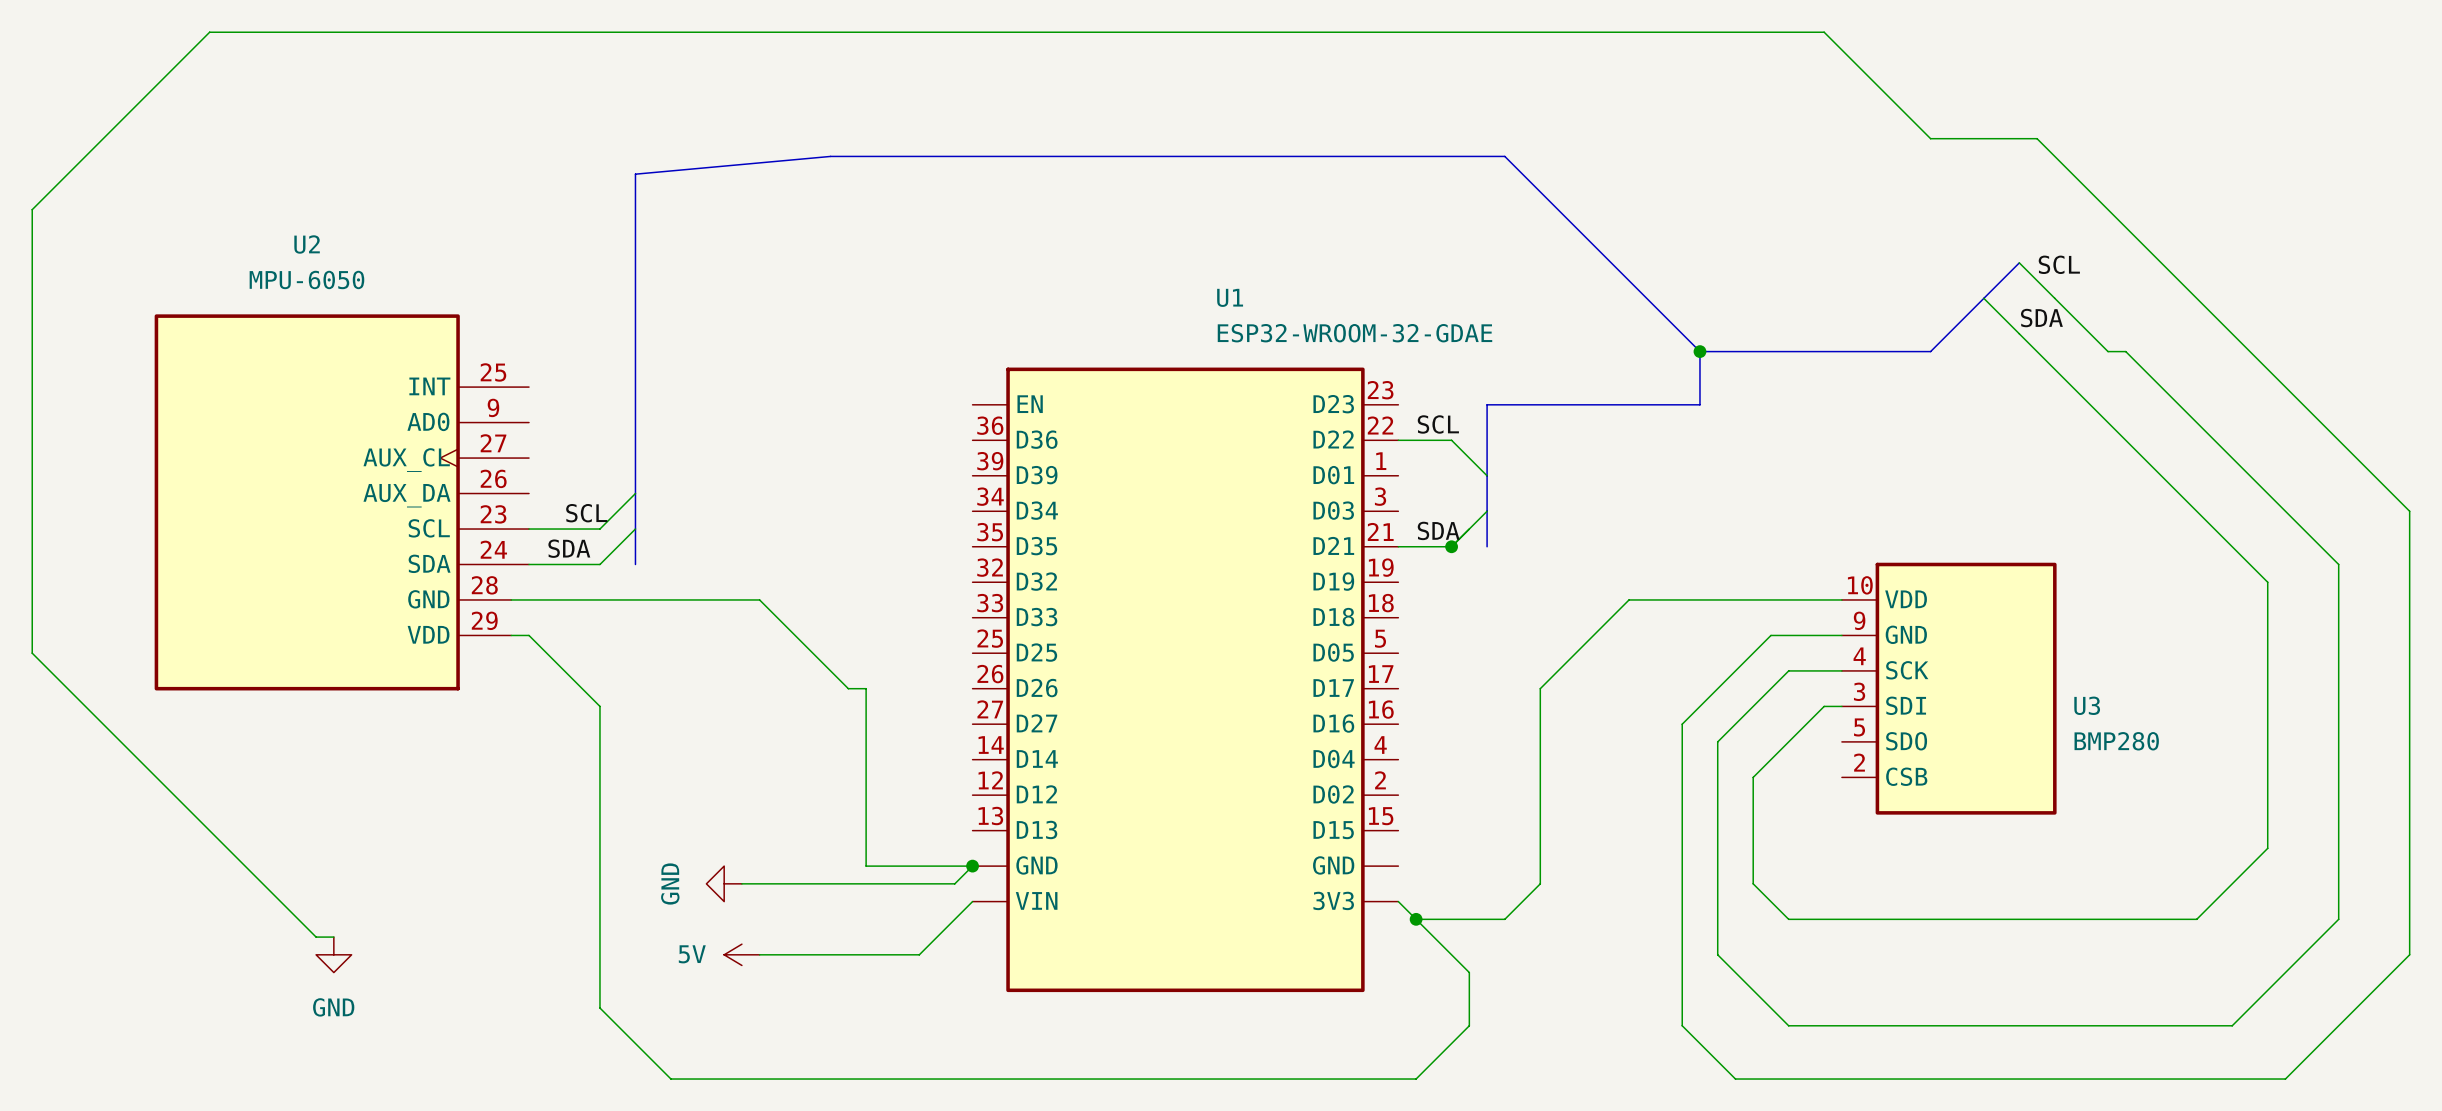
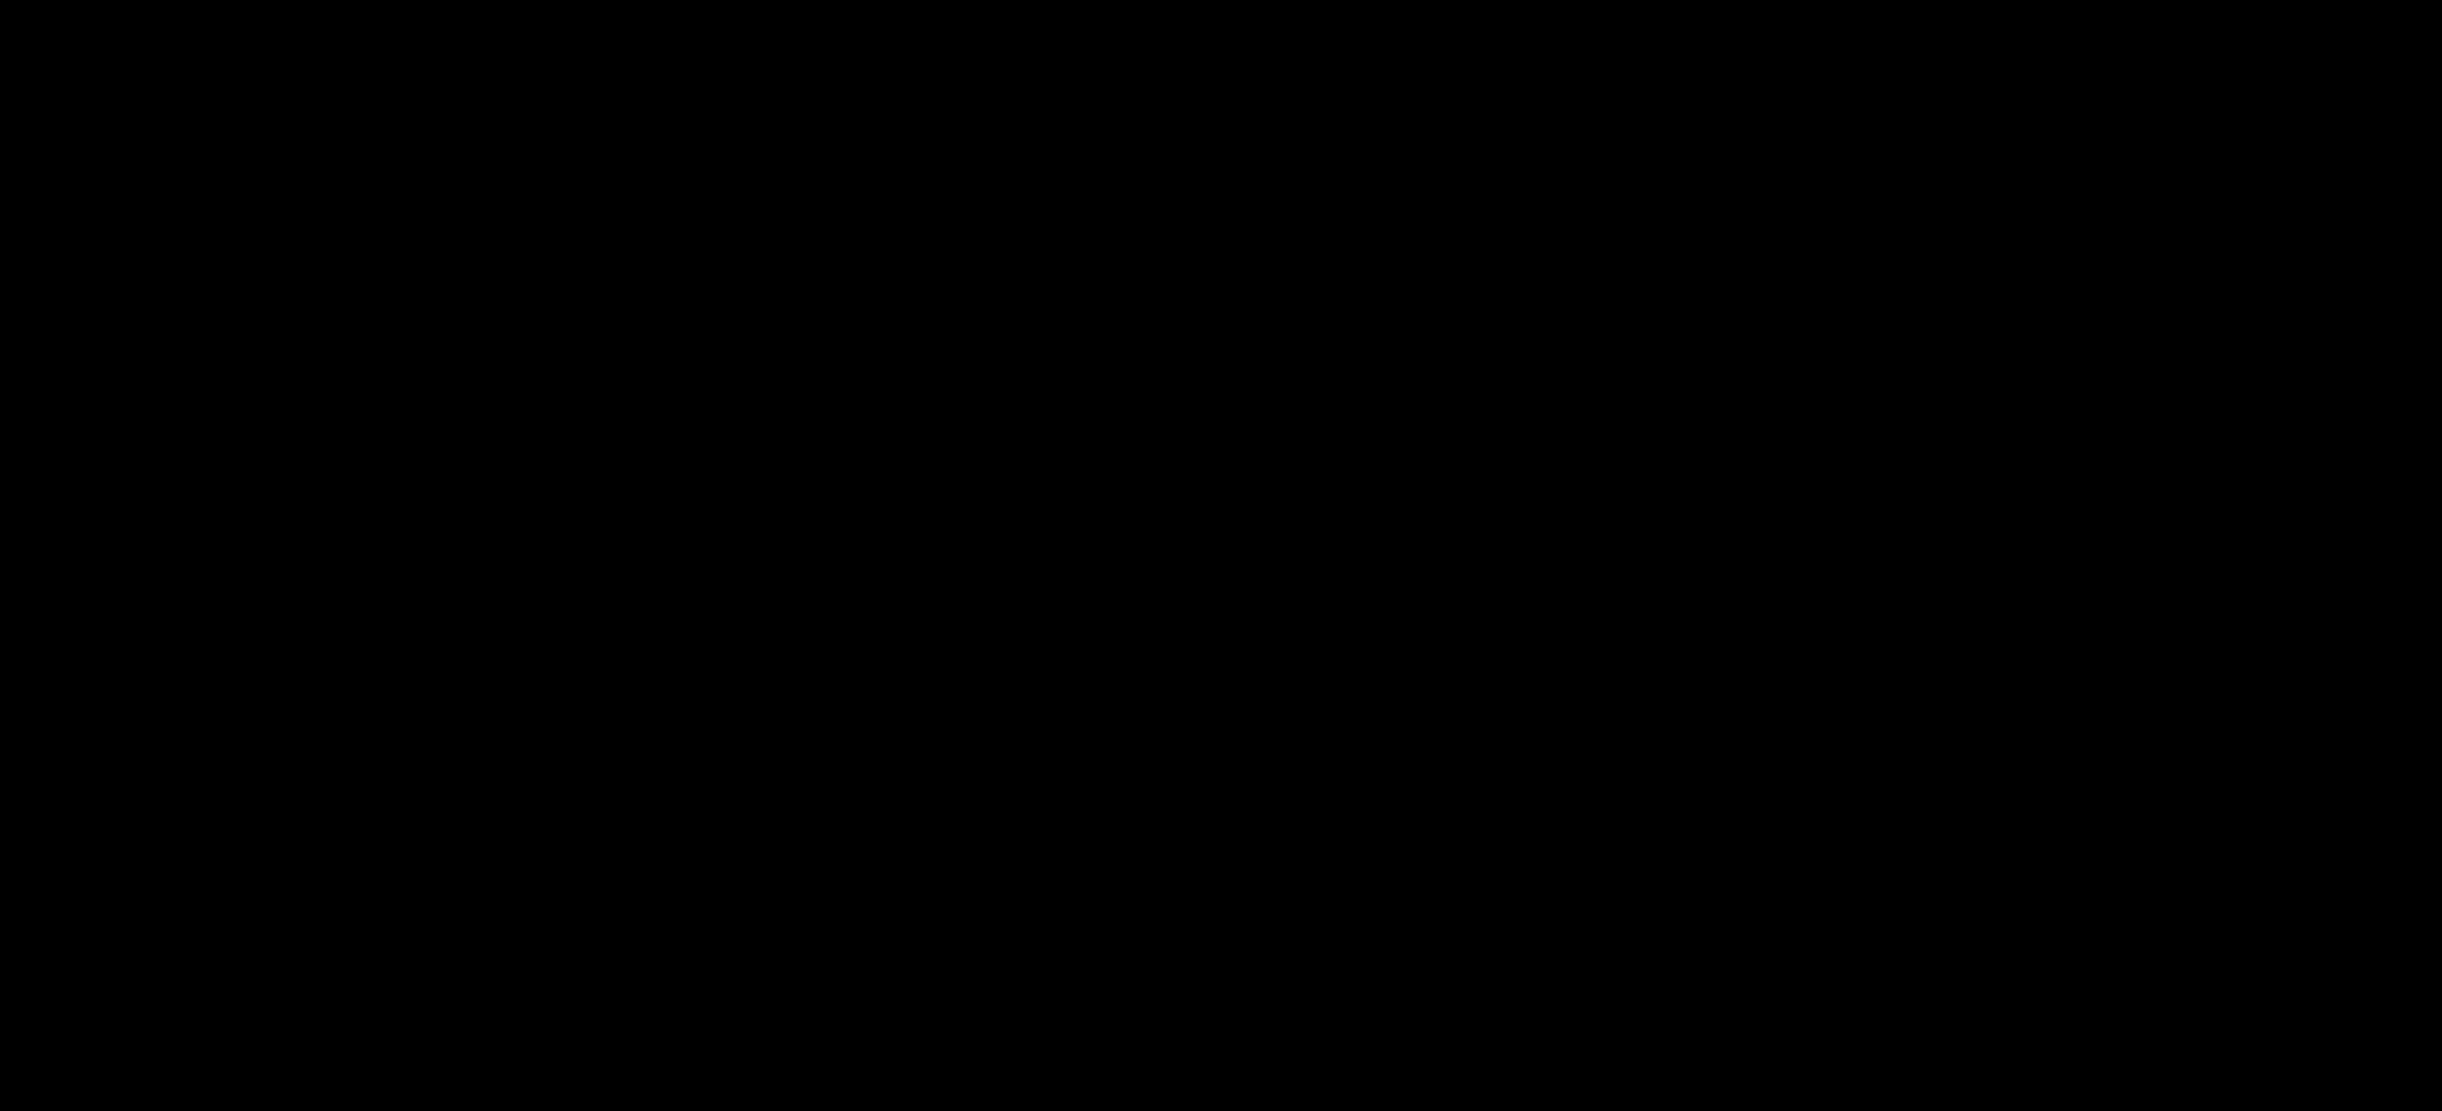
wire: (2019, 262) (2108, 351) (2125, 351) (2338, 564) (2338, 919) (2232, 1025) (1788, 1025) (1717, 954) (1717, 741) (1788, 670) (1841, 670) -> none
bus: (2019, 262) (1930, 351) (1699, 351) -> none
label: SCL (2059, 264) -> none
wire: (1983, 298) (2267, 582) (2267, 848) (2196, 919) (1788, 919) (1753, 883) (1753, 777) (1824, 706) (1841, 706) -> none
label: SDA (2041, 318) -> none
bus: (1699, 351) (1504, 156) (830, 156) (635, 174) (635, 564) -> none
bus: (1699, 351) (1699, 404) (1487, 404) (1487, 546) -> none
junction: (1699, 351) -> none
label: SCL (1438, 424) -> none
wire: (1398, 440) (1451, 440) (1487, 475) -> none
wire: (635, 493) (599, 529) (529, 529) -> none
U2: MPU-6050 (341, 502) -> none
wire: (1487, 511) (1451, 546) (1398, 546) -> none
label: SCL (586, 513) -> none
wire: (635, 529) (599, 564) (529, 564) -> none
label: SDA (1438, 530) -> none
junction: (1451, 546) -> none
label: SDA (569, 548) -> none
wire: (511, 599) (759, 599) (848, 688) (866, 688) (866, 866) (972, 866) (954, 883) (741, 883) -> none
wire: (1841, 599) (1629, 599) (1540, 688) (1540, 883) (1504, 919) (1416, 919) -> none
wire: (511, 635) (529, 635) (599, 706) (599, 1008) (670, 1079) (1416, 1079) (1469, 1025) (1469, 972) (1398, 901) -> none
wire: (1841, 635) (1770, 635) (1682, 724) (1682, 1025) (1735, 1079) (2285, 1079) (2409, 954) (2409, 511) (2037, 138) (1930, 138) (1824, 32) (209, 32) (32, 209) (32, 653) (316, 937) (333, 937) -> none
U1: ESP32-WROOM-32-GDAE (1185, 679) -> none
U3: BMP280 (1949, 688) -> none
junction: (972, 866) -> none
power symbol: GND (724, 883) -> none
wire: (972, 901) (919, 954) (759, 954) -> none
junction: (1416, 919) -> none
power symbol: GND (333, 954) -> none
power symbol: 5V (741, 954) -> none

